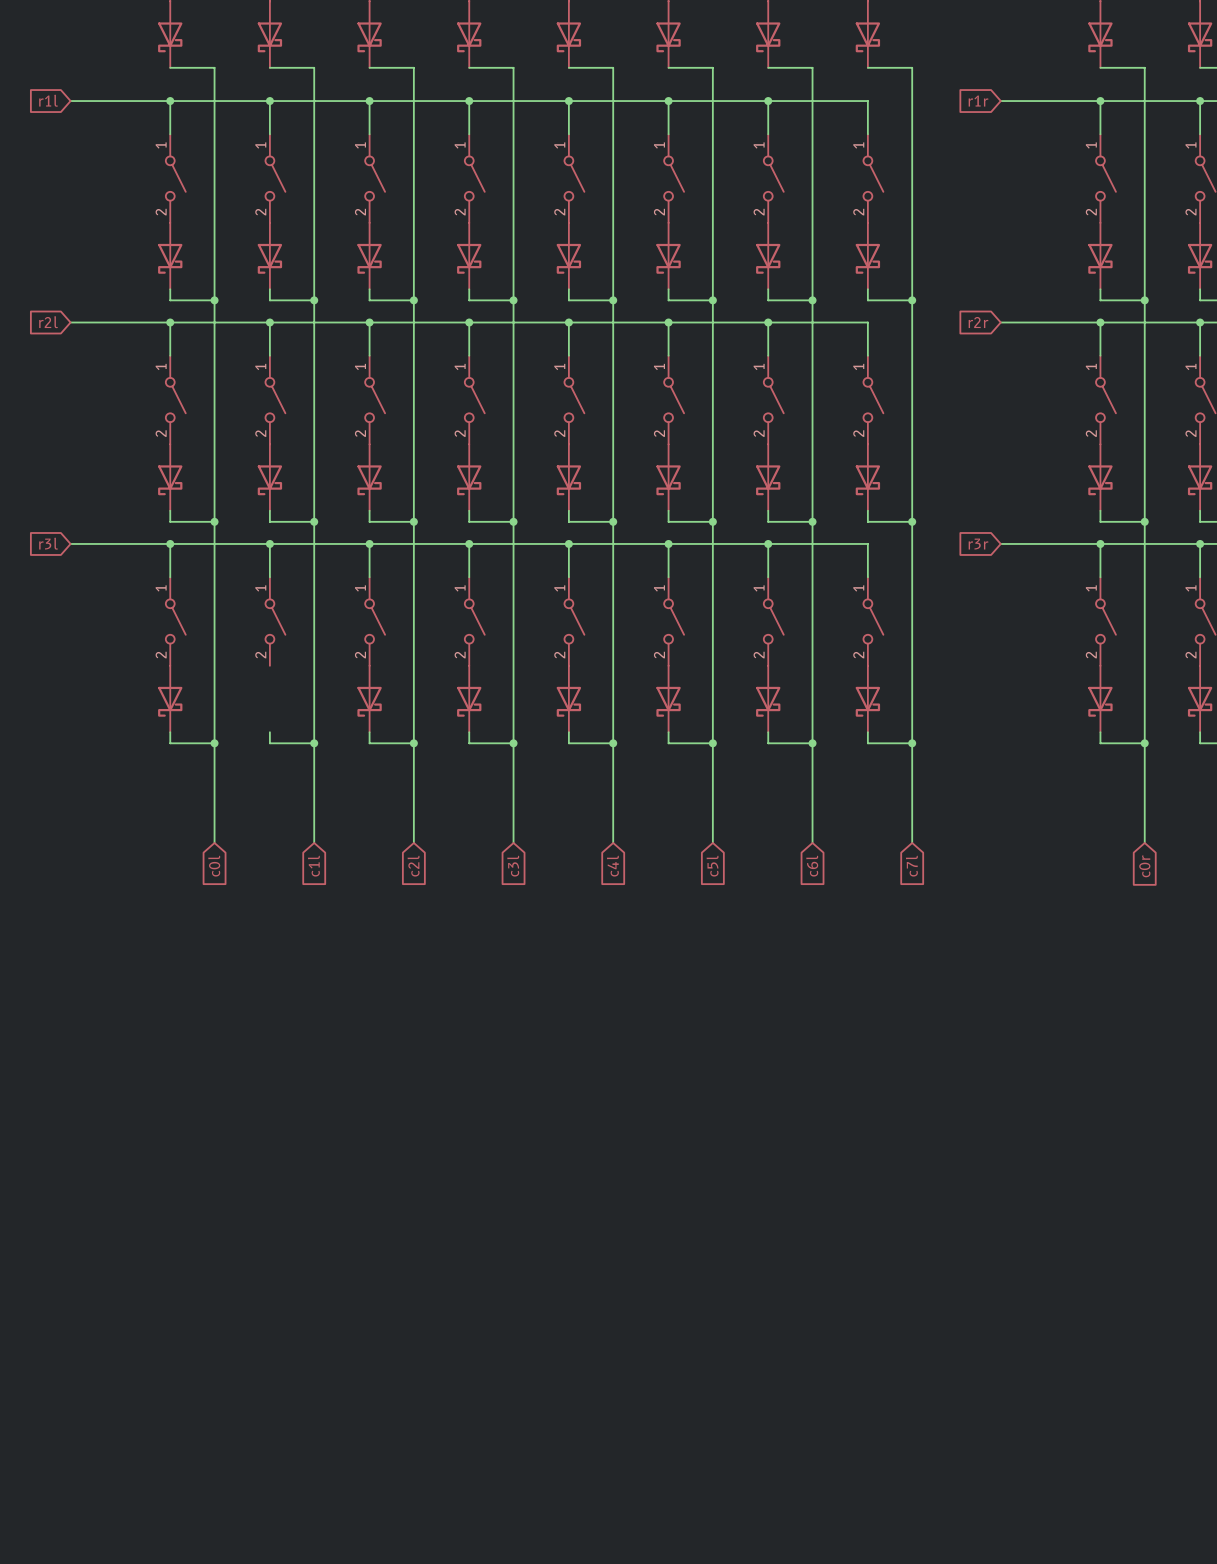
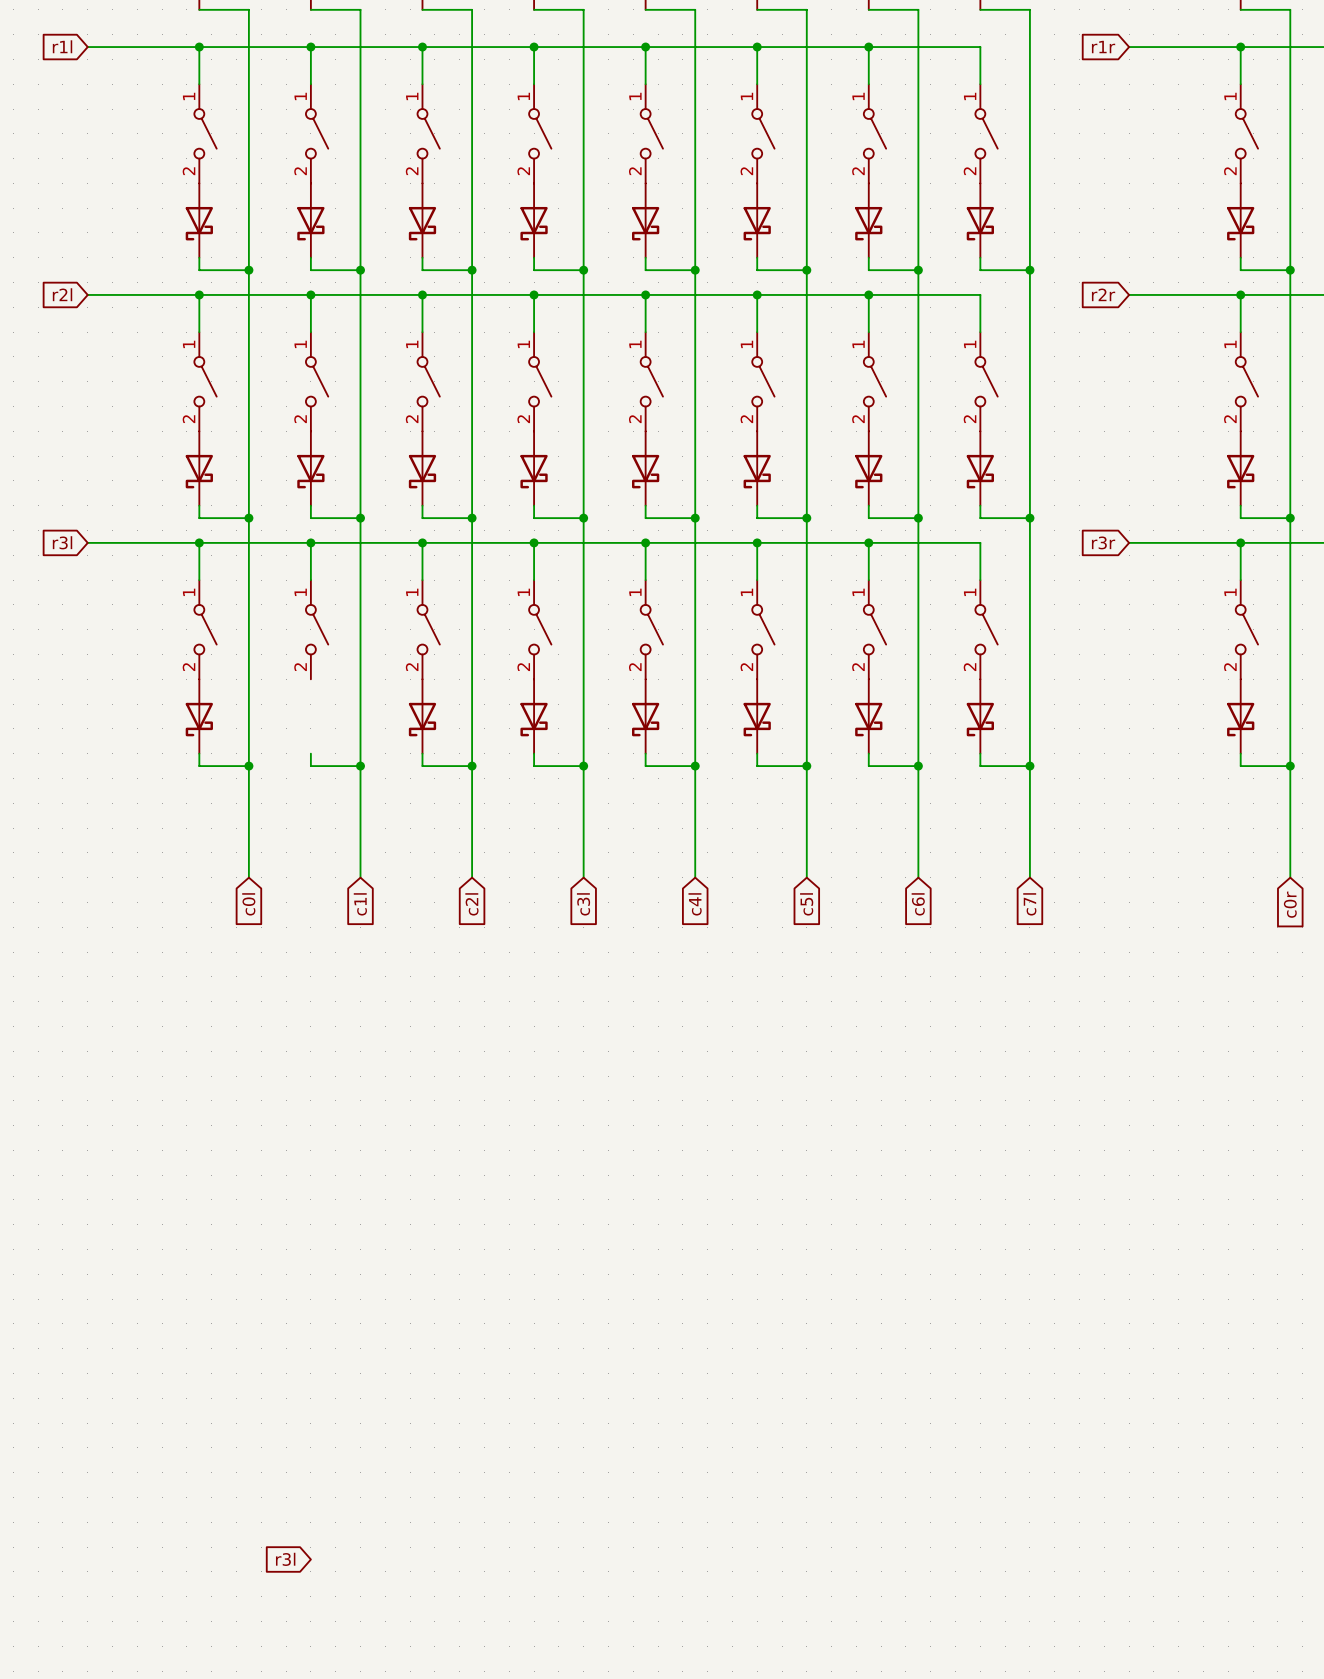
global label: none -> r3l (285, 1559)

